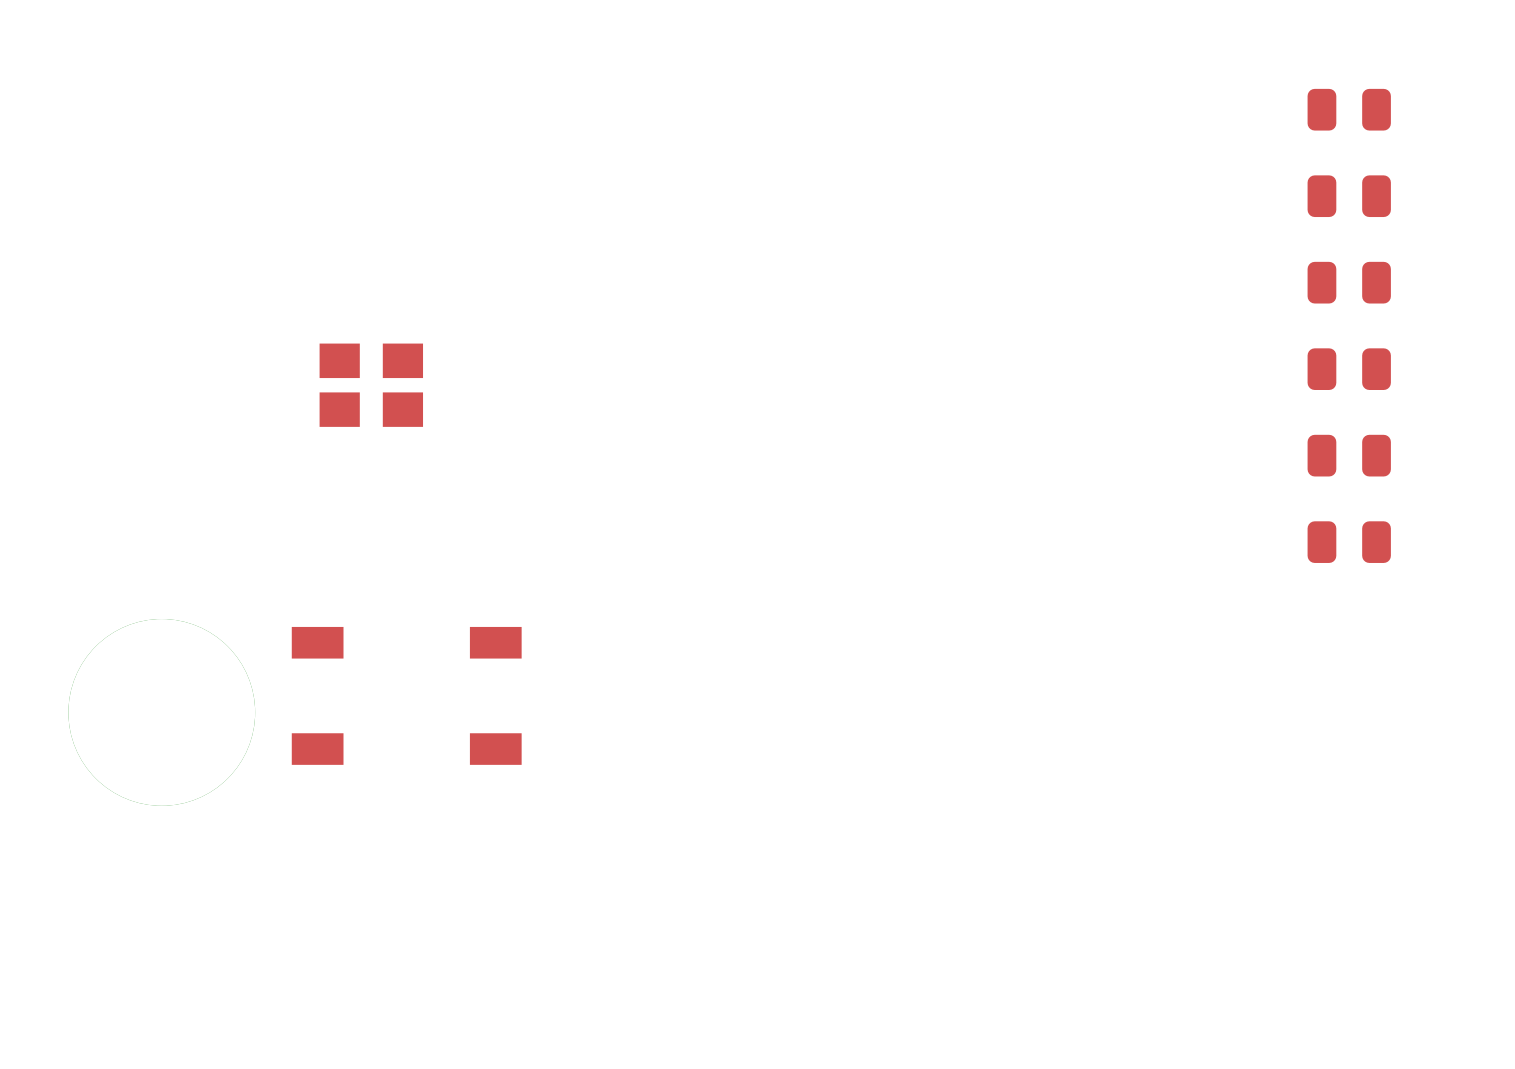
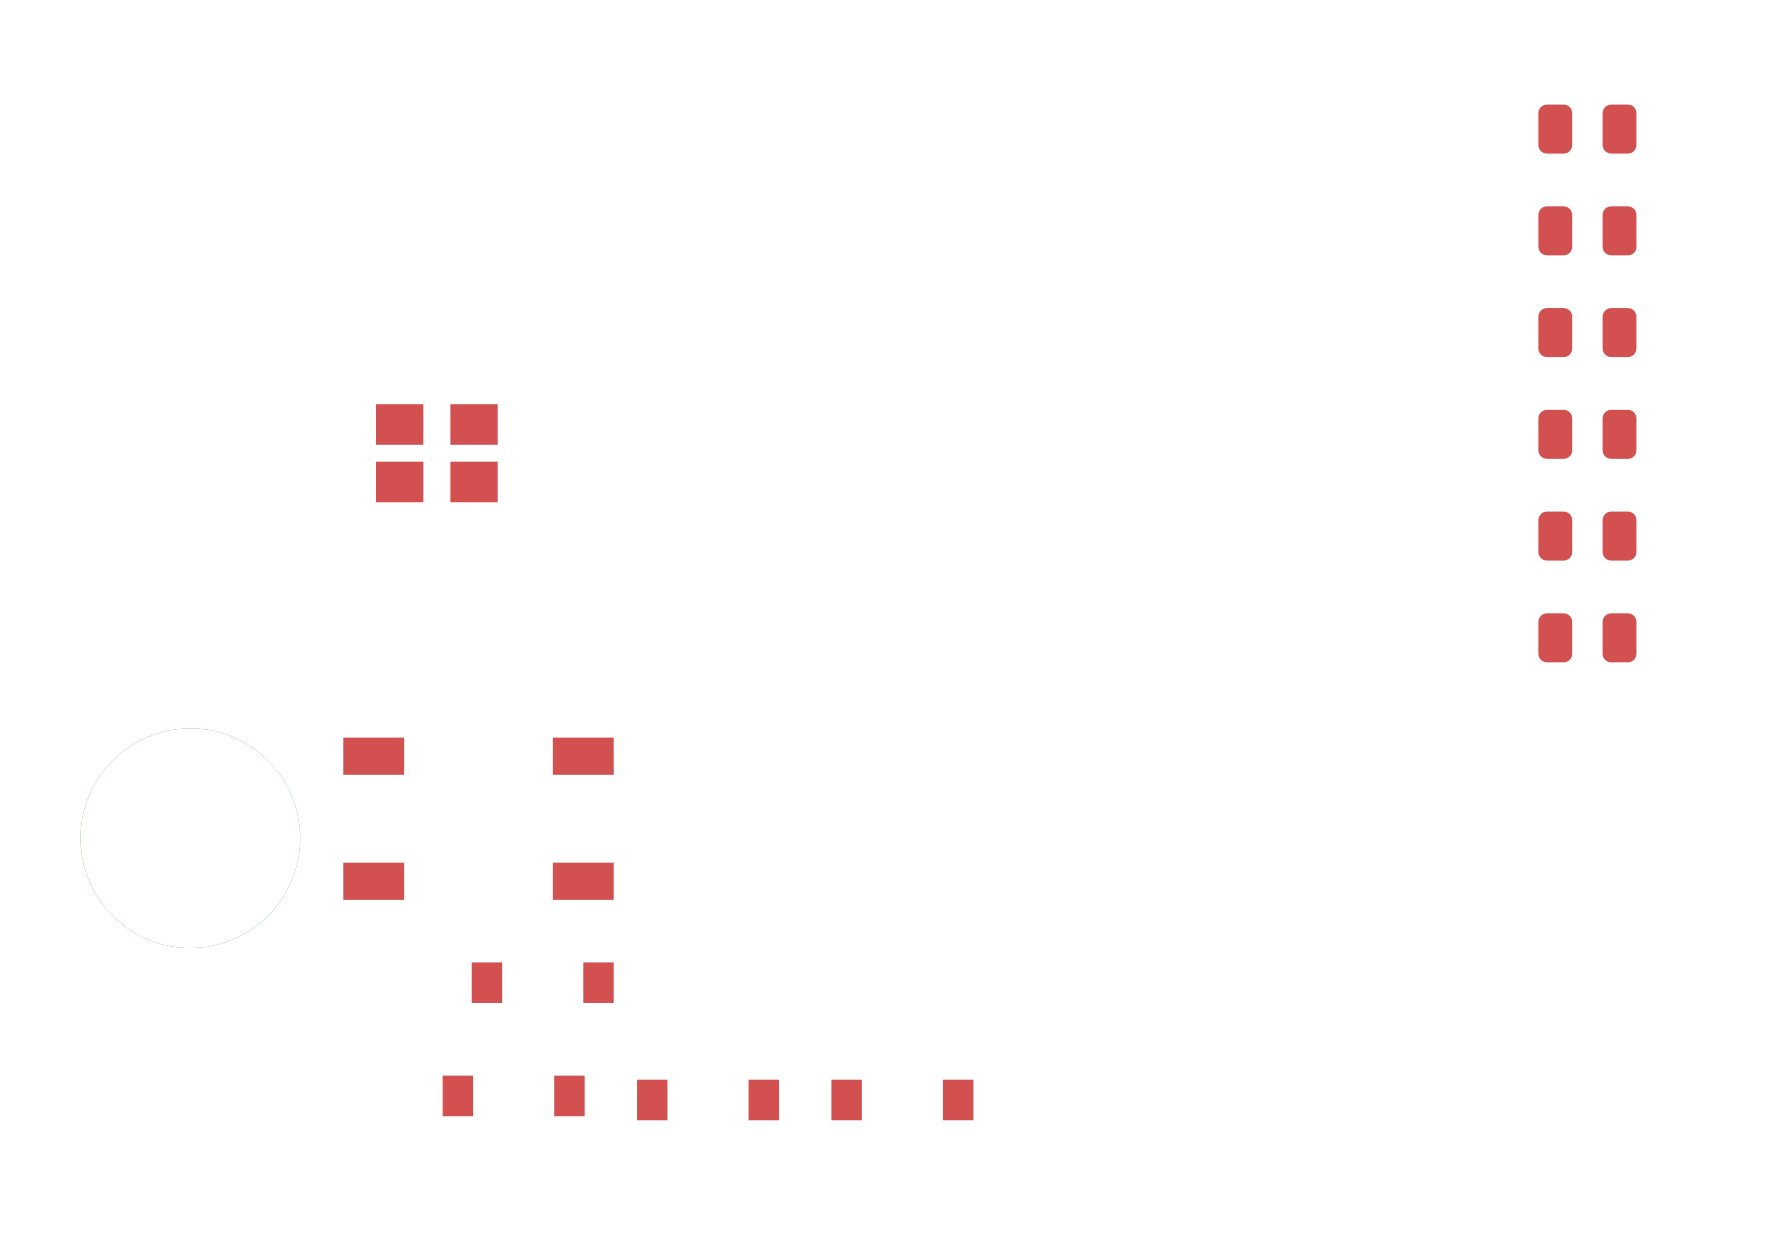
part: none -> (542, 982)
part: none -> (513, 1095)
part: none -> (708, 1099)
part: none -> (902, 1099)

